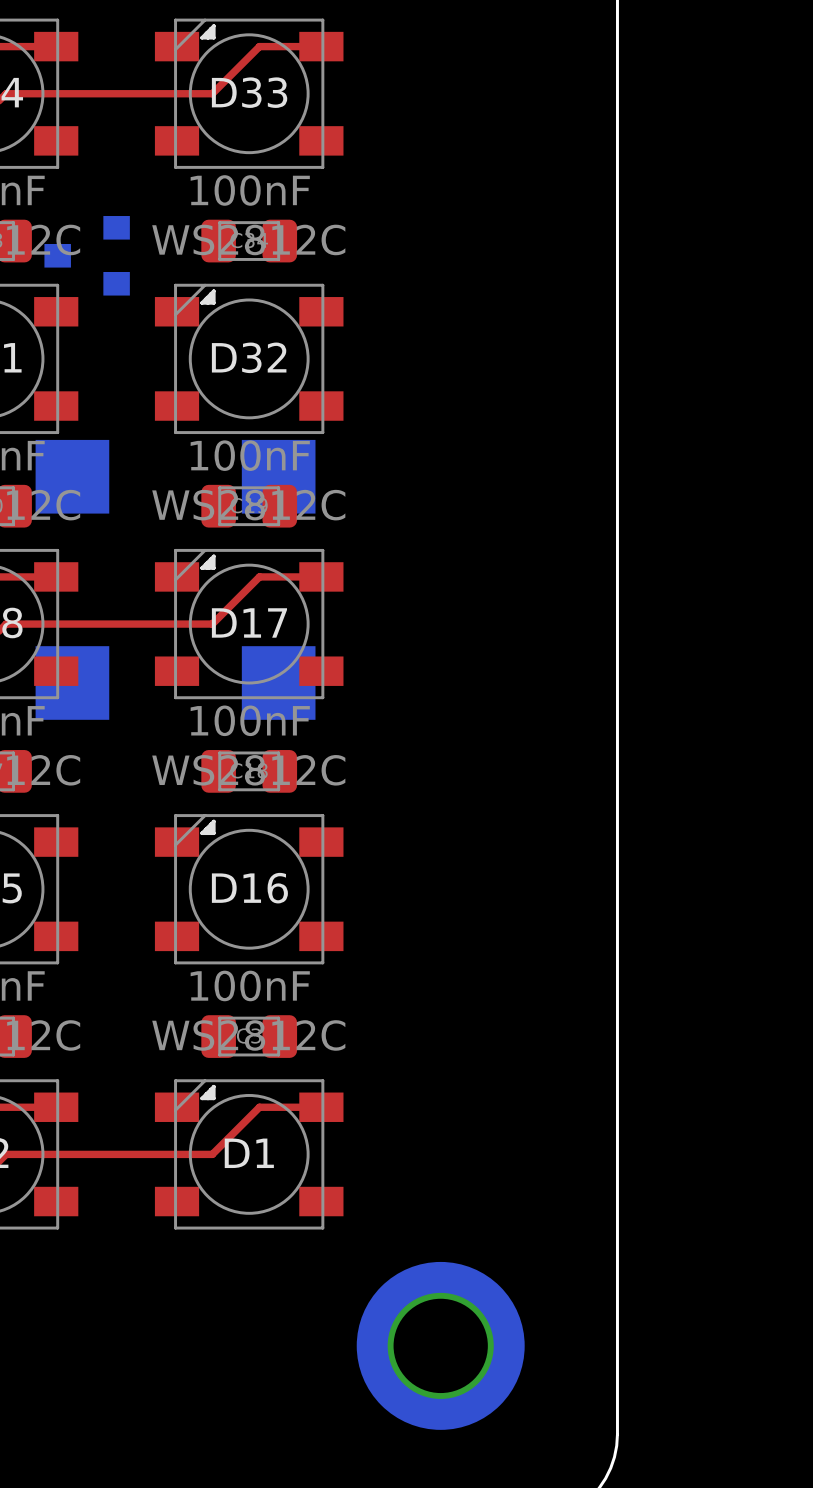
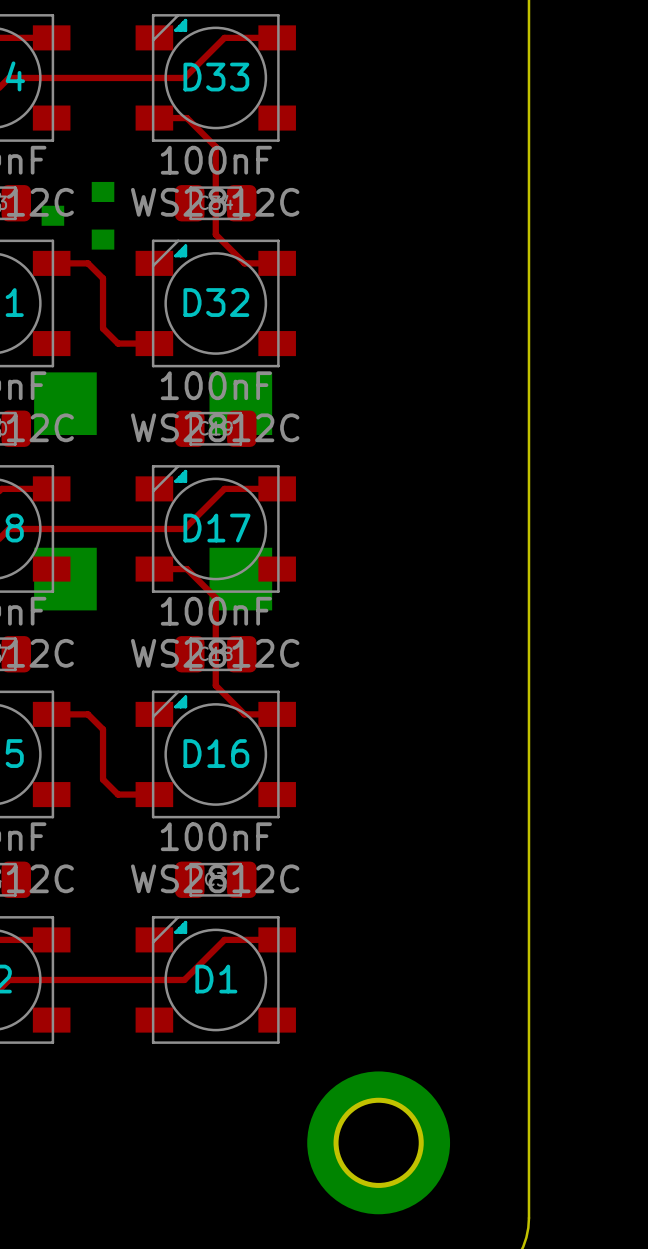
top track: none -> (154, 118) (186, 118) (215, 146) (215, 234) (244, 263) (277, 263)
top track: none -> (51, 263) (87, 263) (103, 278) (103, 328) (118, 343) (154, 343)
top track: none -> (154, 569) (186, 569) (215, 597) (215, 685) (244, 714) (277, 714)
top track: none -> (51, 714) (87, 714) (103, 729) (103, 779) (118, 794) (154, 794)

